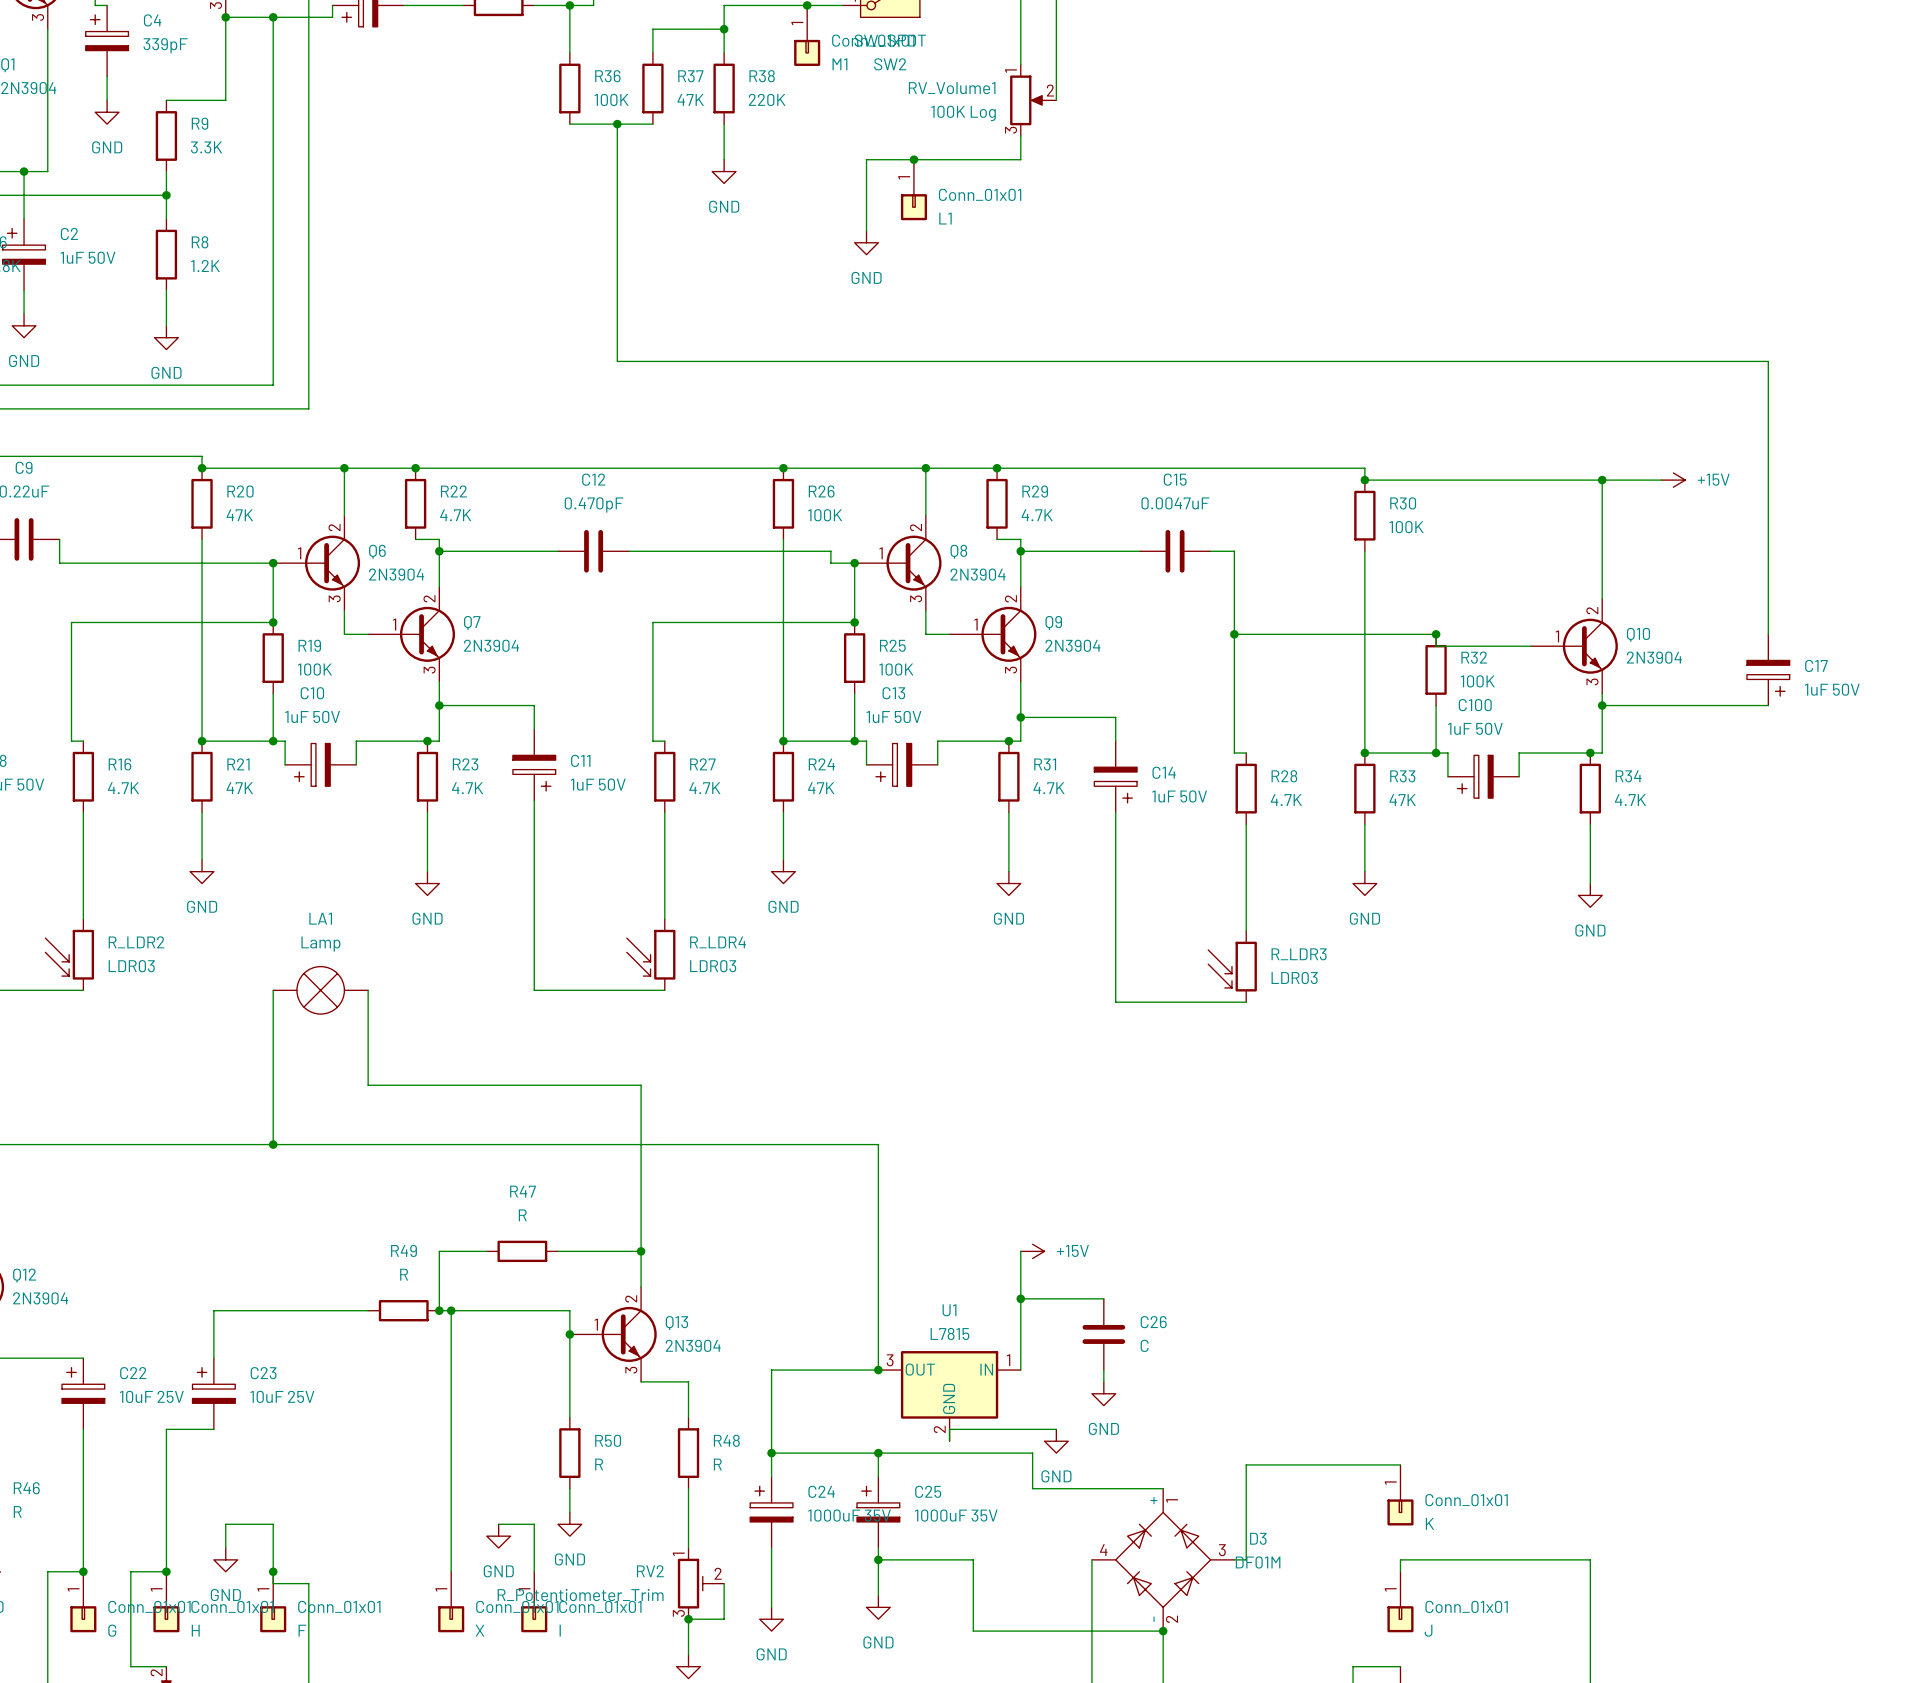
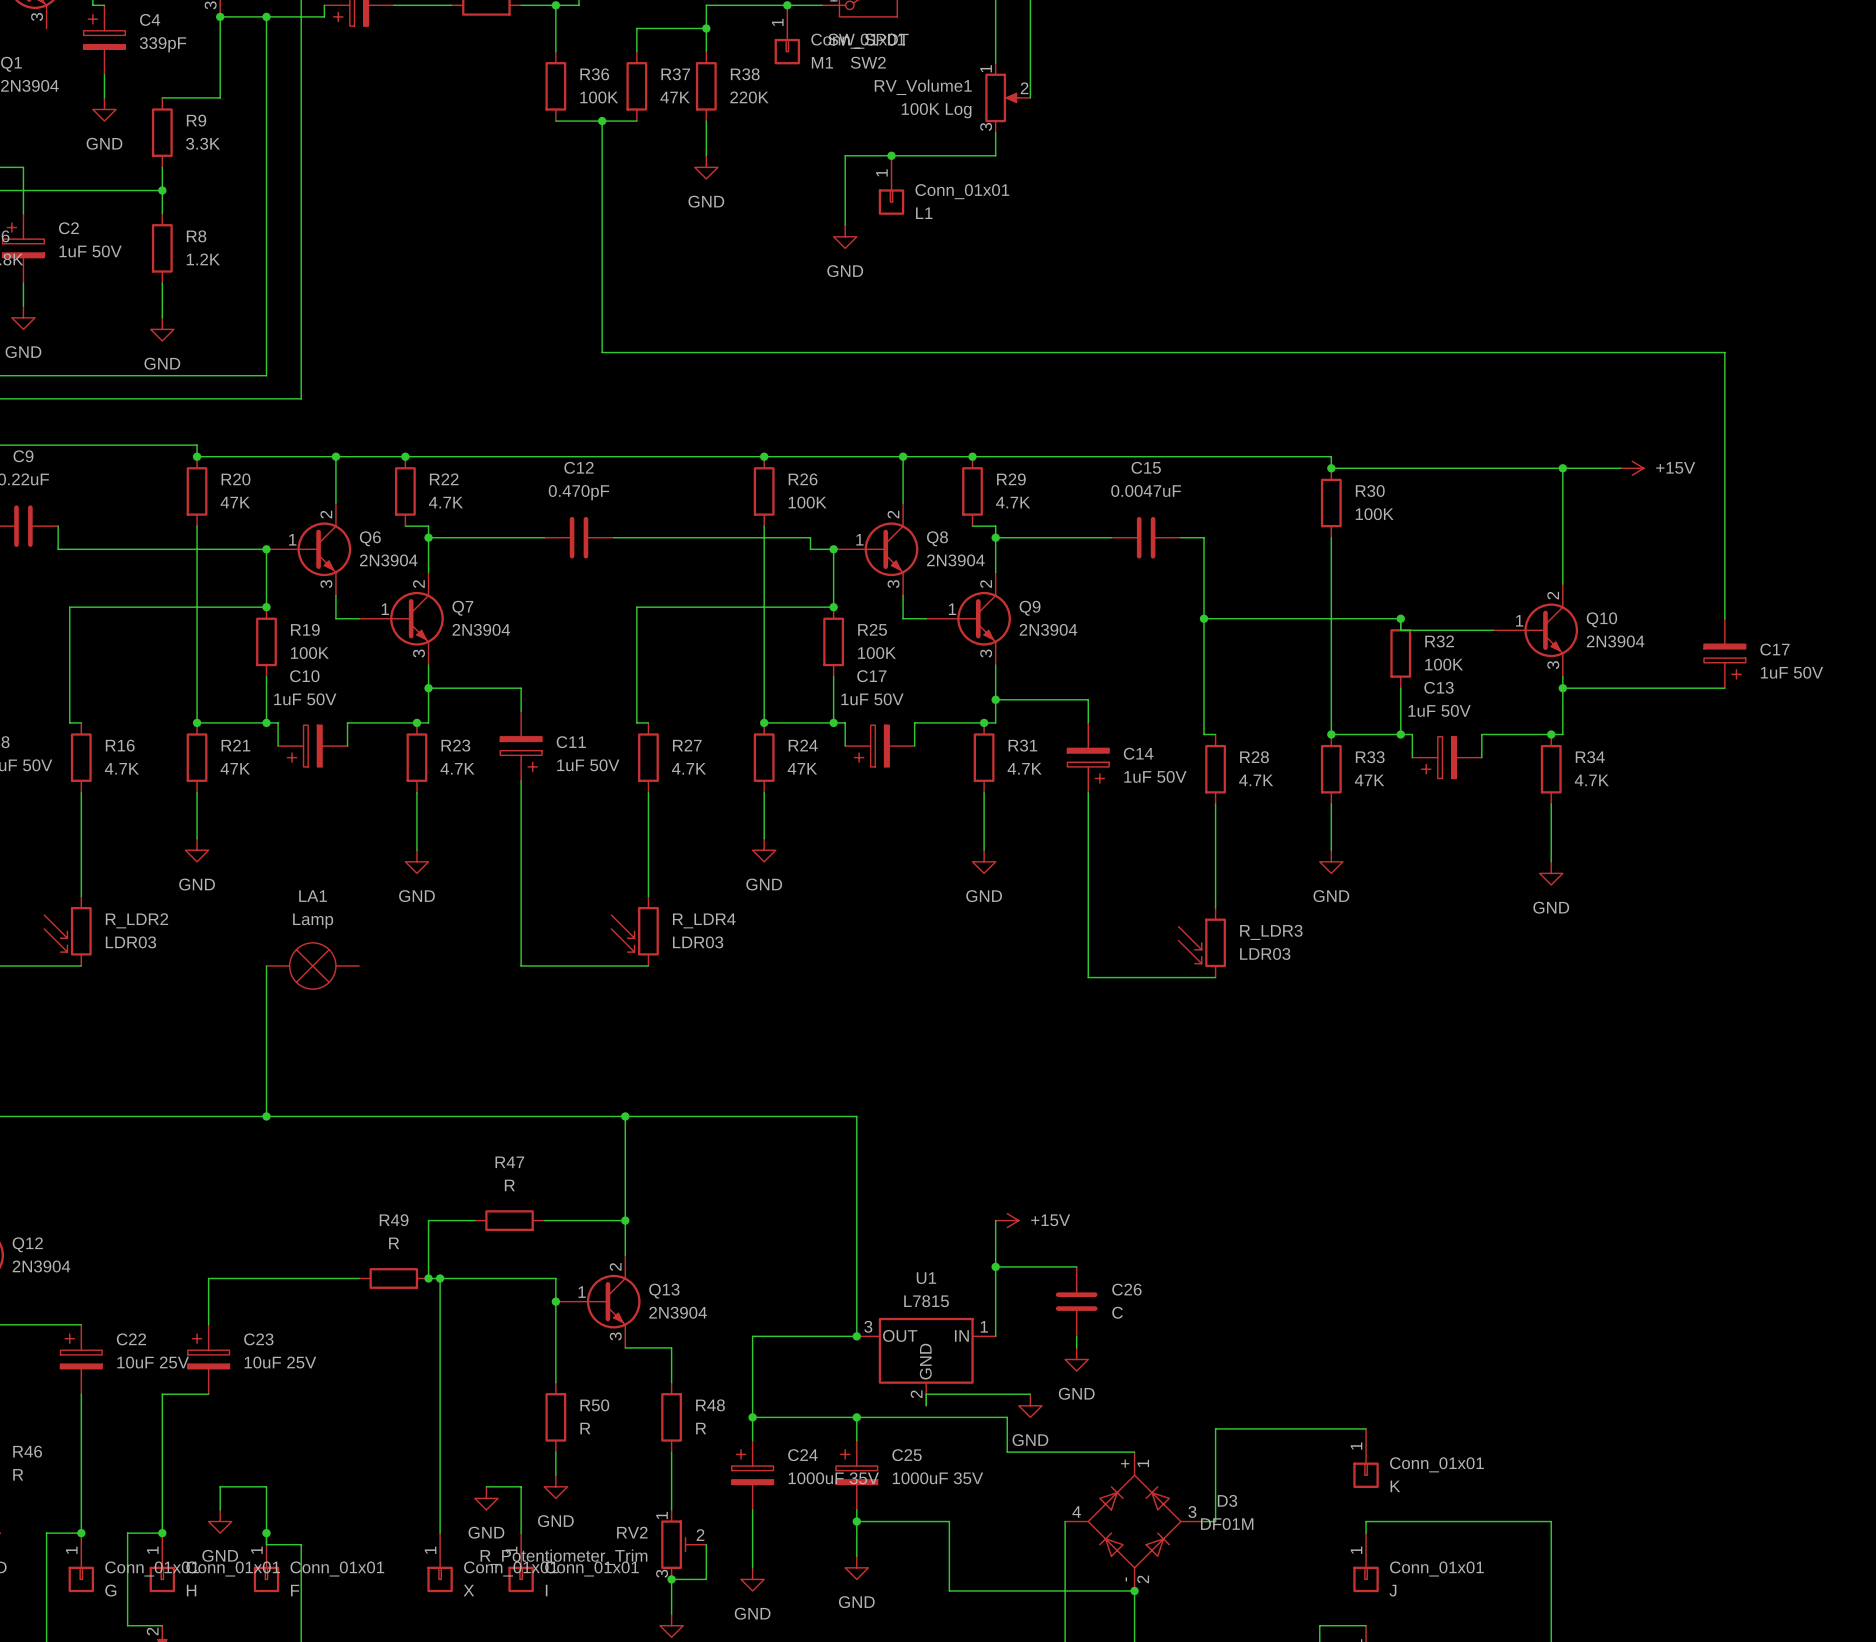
wire: (47, 29) (47, 171) (24, 171) -> none
junction: (24, 171) -> none
C13 name: C13 (893, 693) -> C17 (871, 676)
C100 name: C100 (1475, 705) -> C13 (1439, 687)
wire: (368, 990) (368, 1085) (641, 1085) (641, 1144) -> none
junction: none -> (625, 1116)

